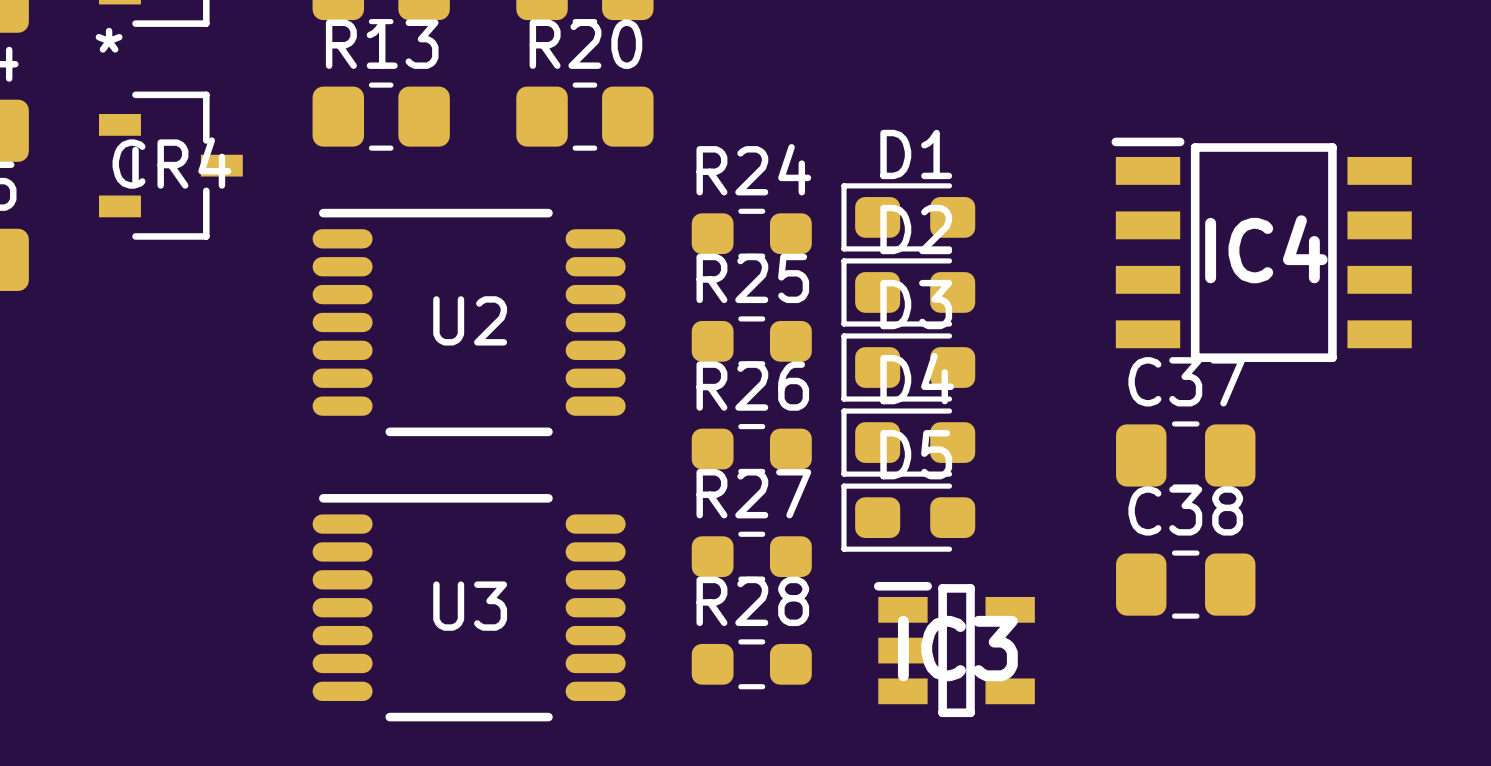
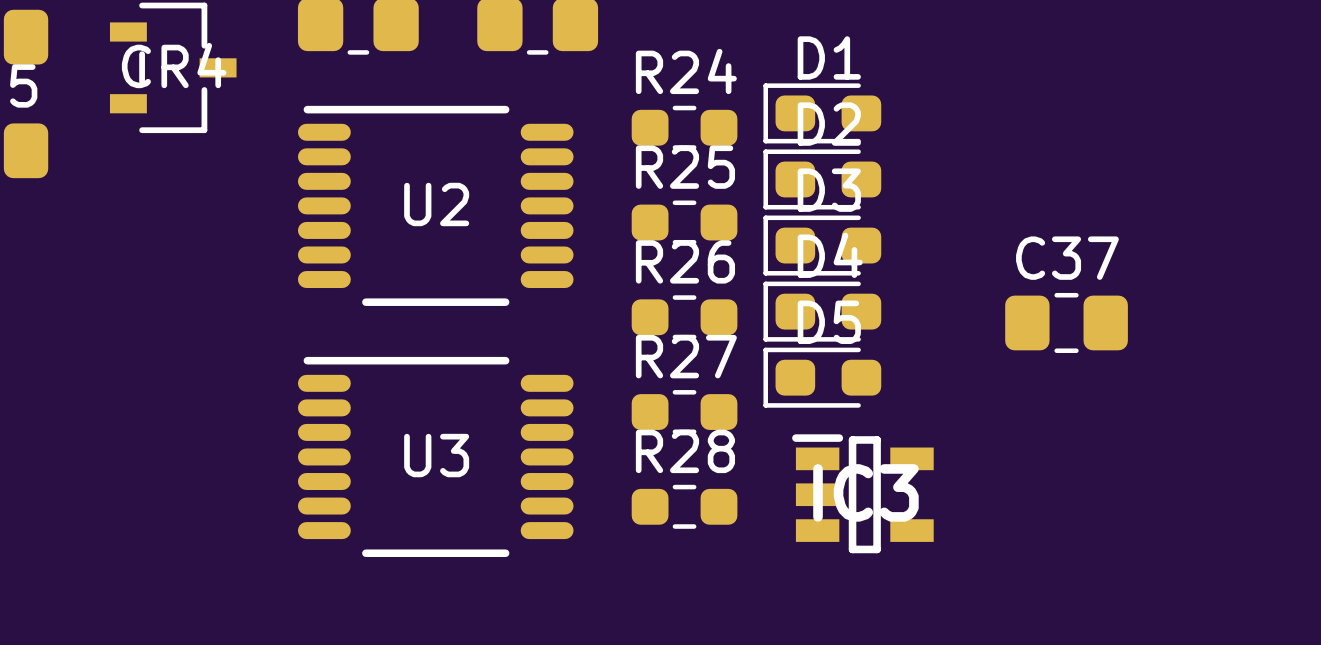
IC4: (1261, 249) -> none
C38: (1185, 584) -> none

